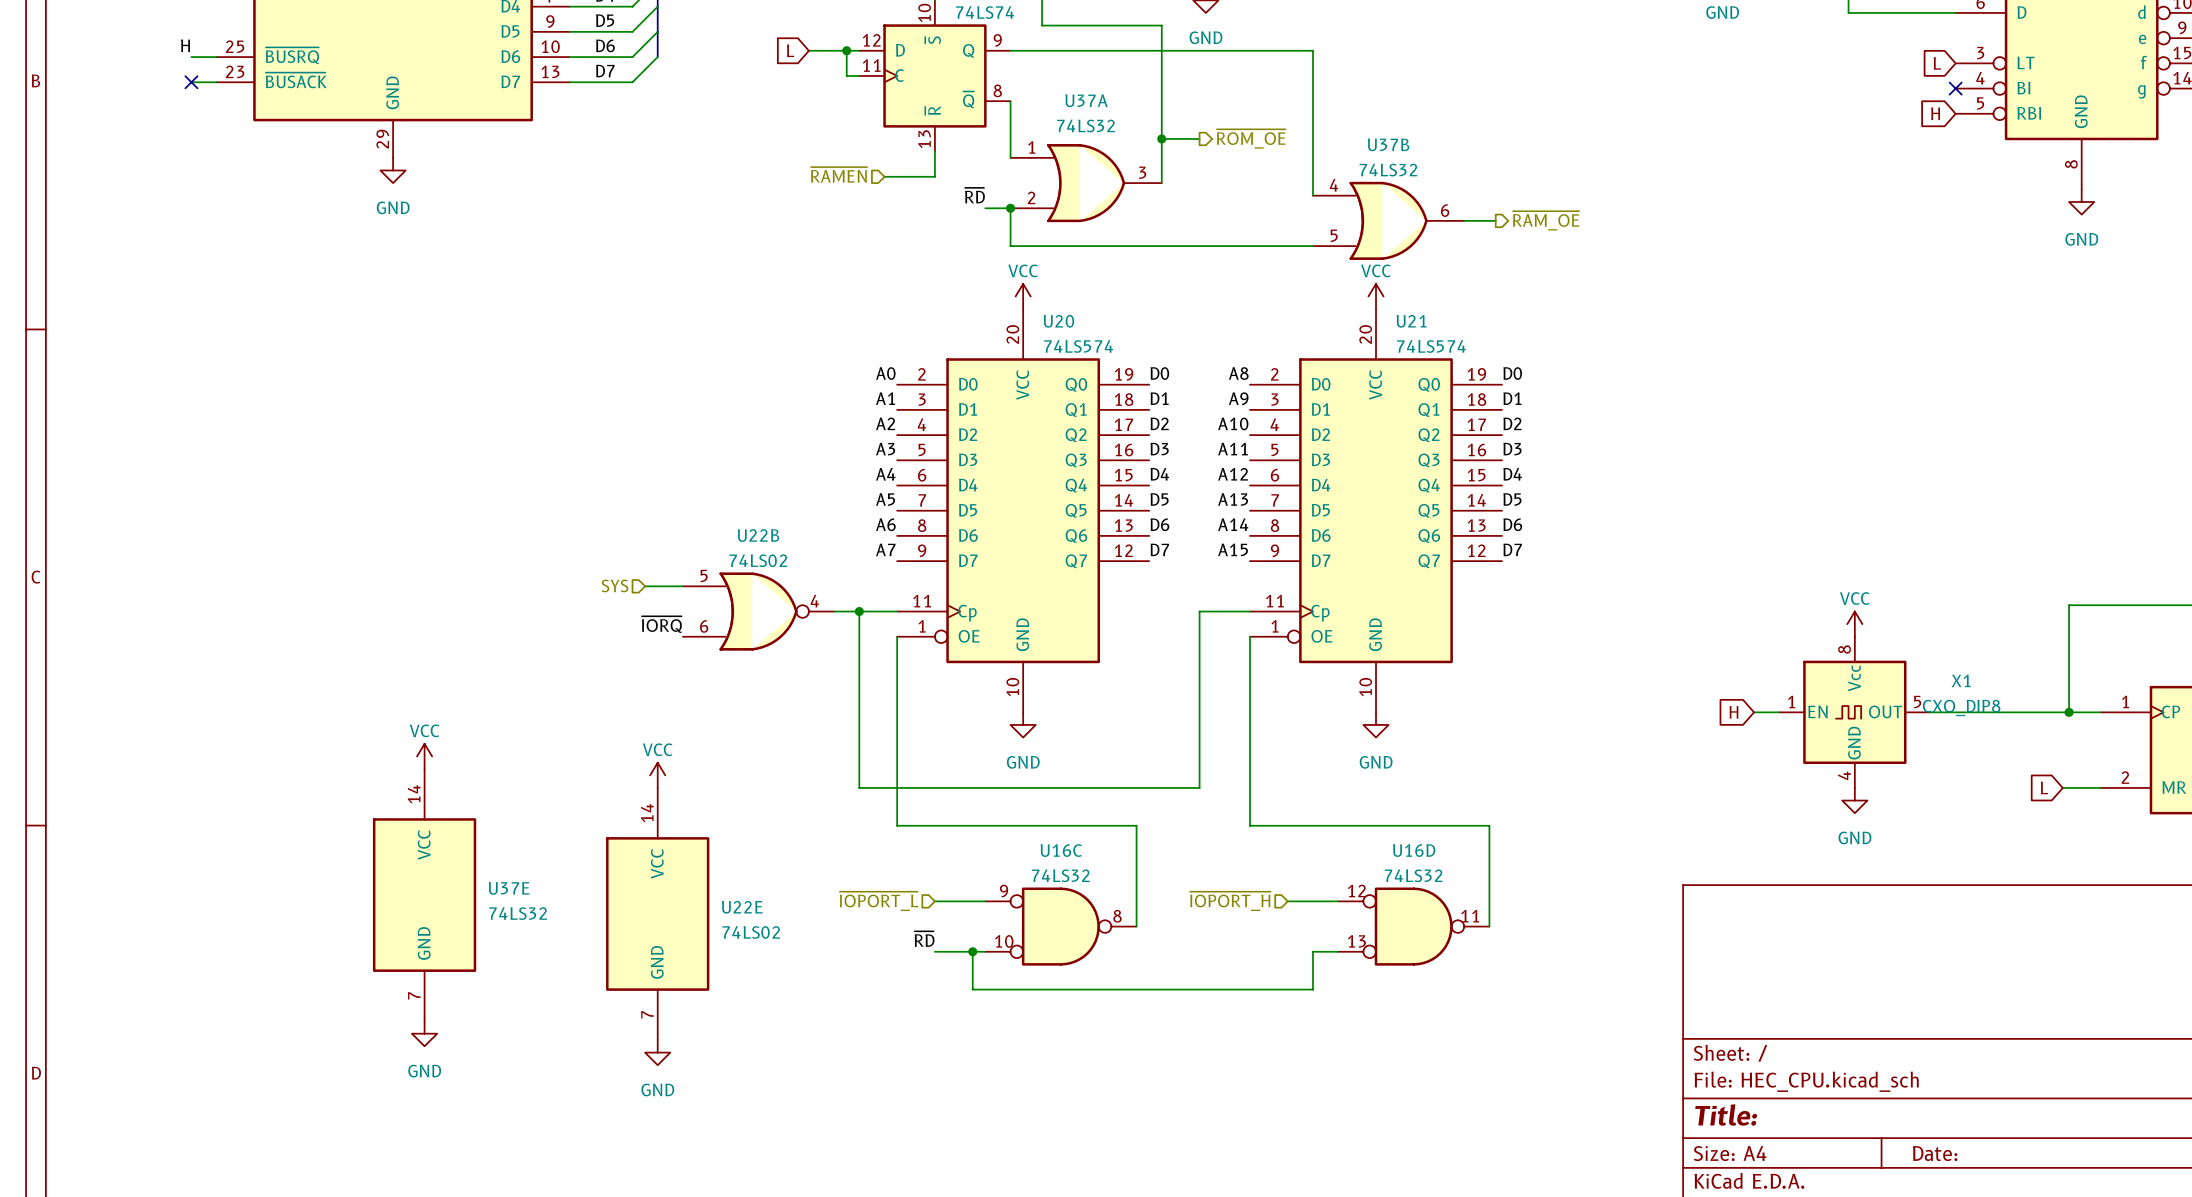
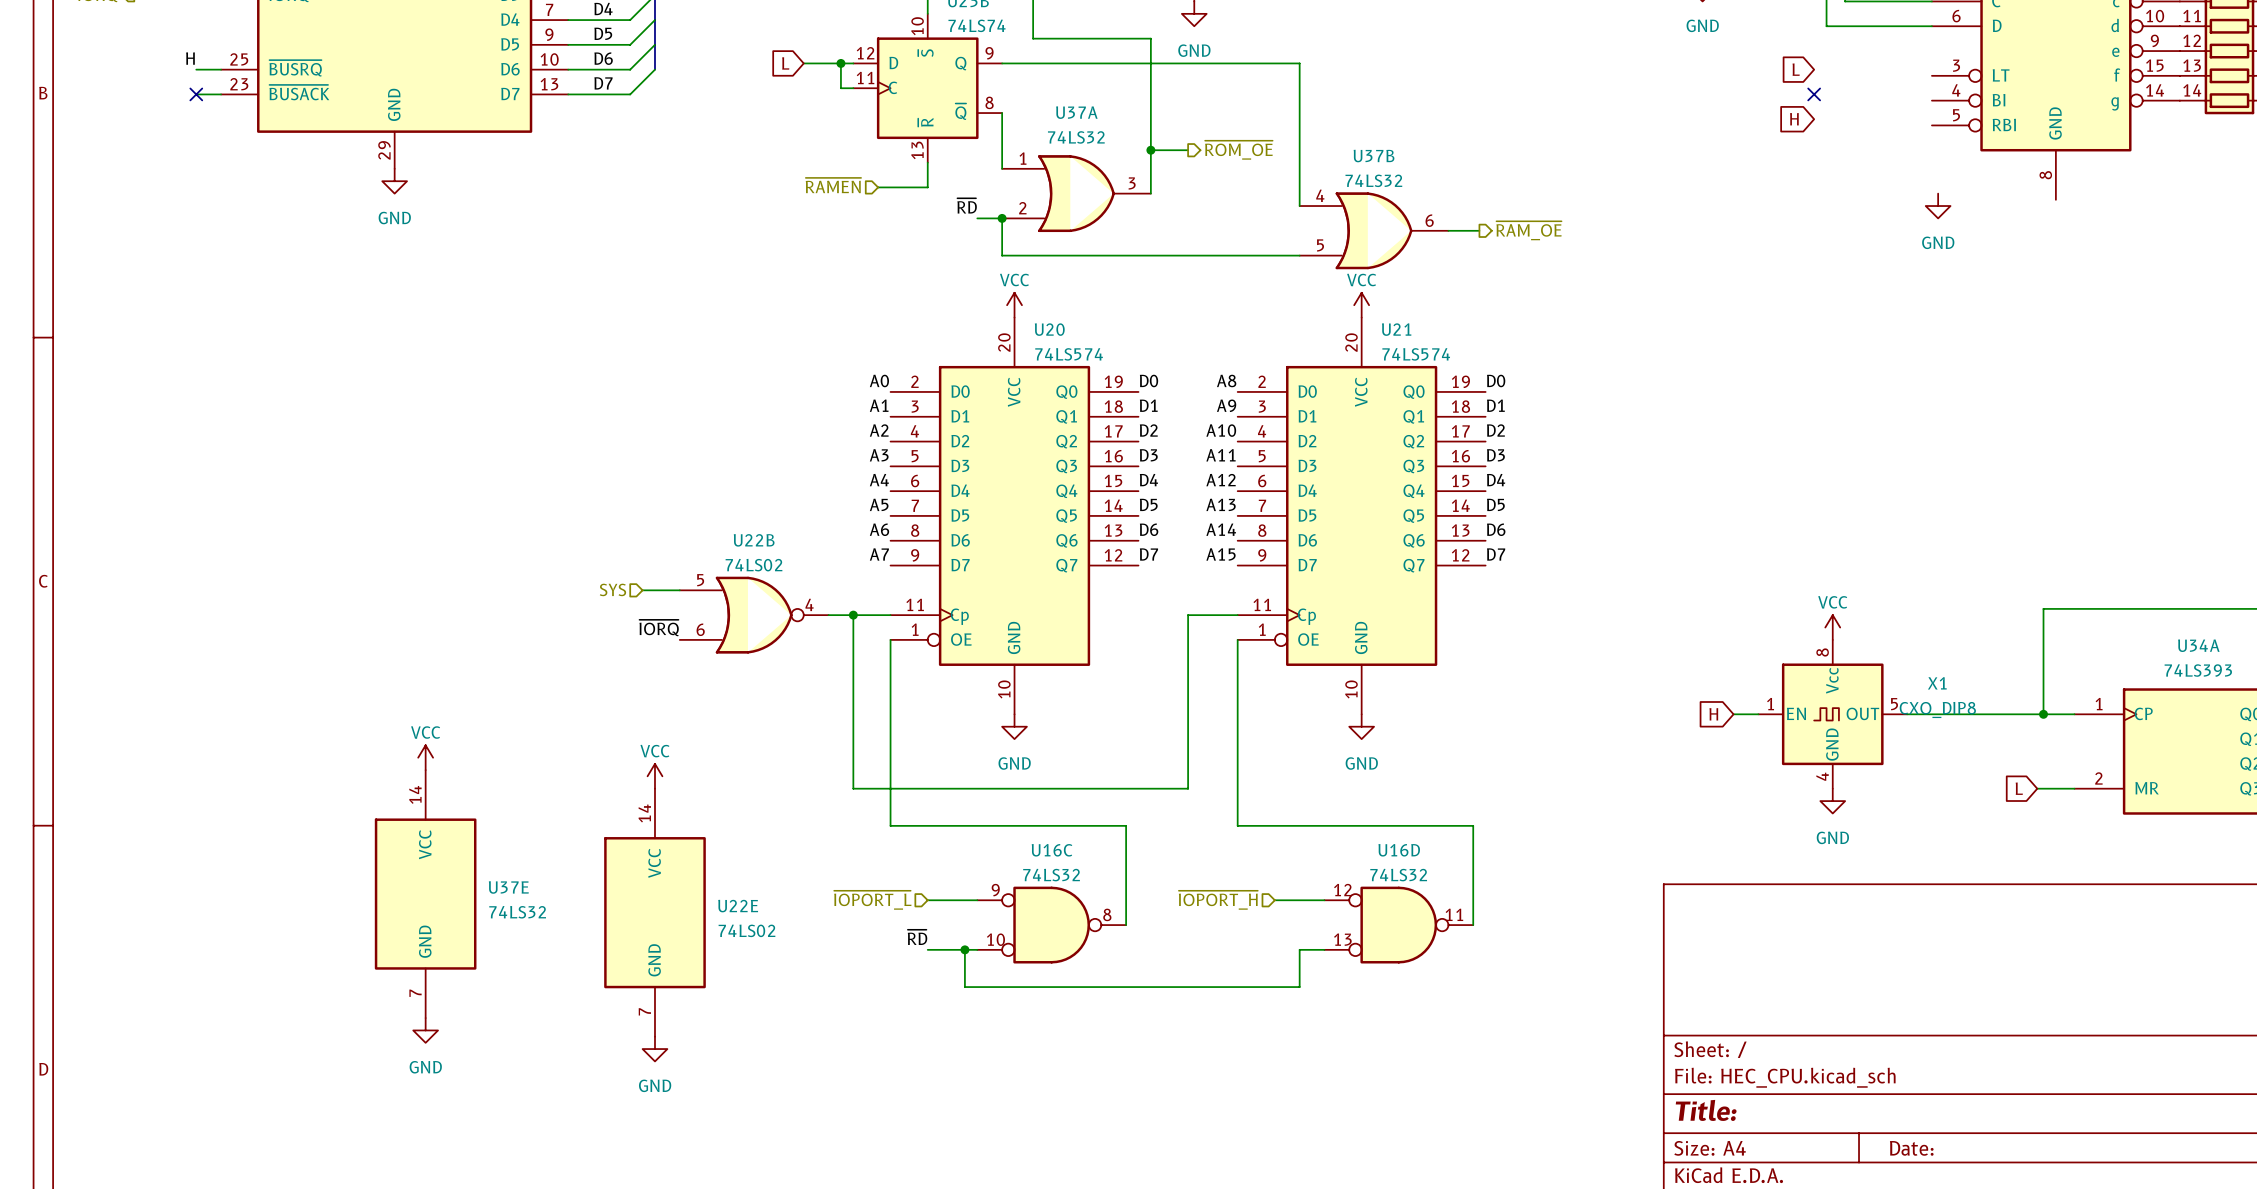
global label position: L (1937, 63) -> L (1796, 69)
no-connect mark: none -> (1814, 94)
no-connect mark: (1955, 88) -> none
global label position: H (1935, 113) -> H (1794, 119)
power symbol position: GND (2081, 201) -> GND (1938, 206)

